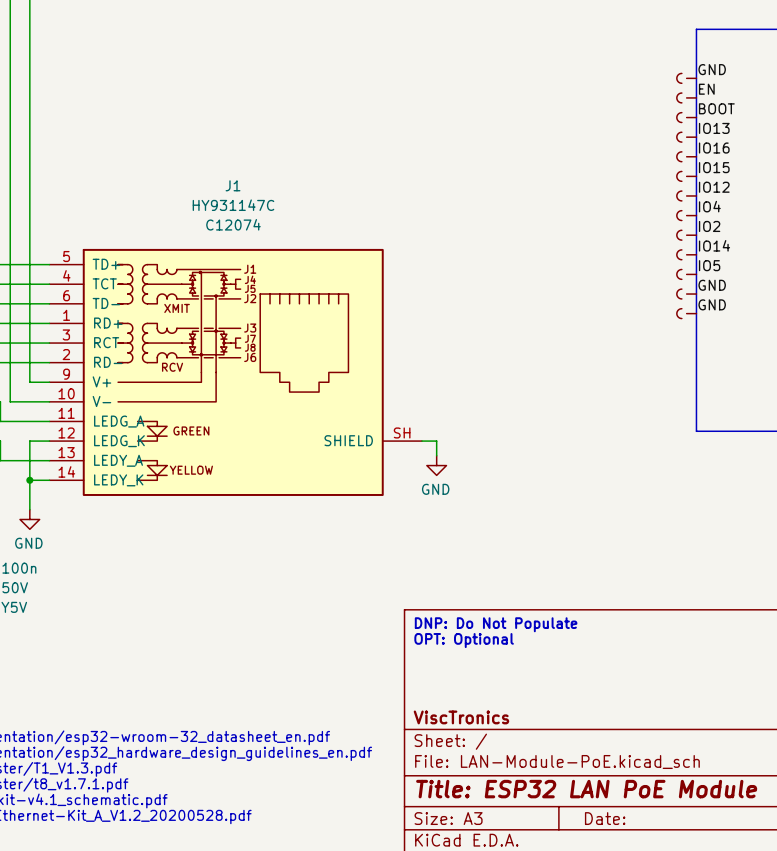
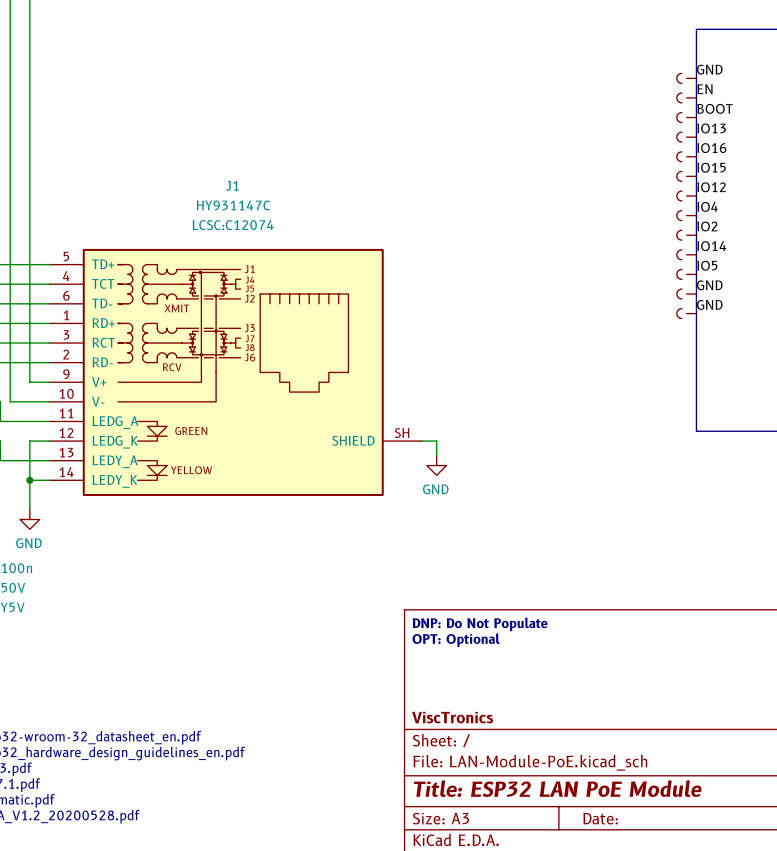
J1 text: C12074 (233, 224) -> none
J1 text: none -> LCSC:C12074 (233, 225)

